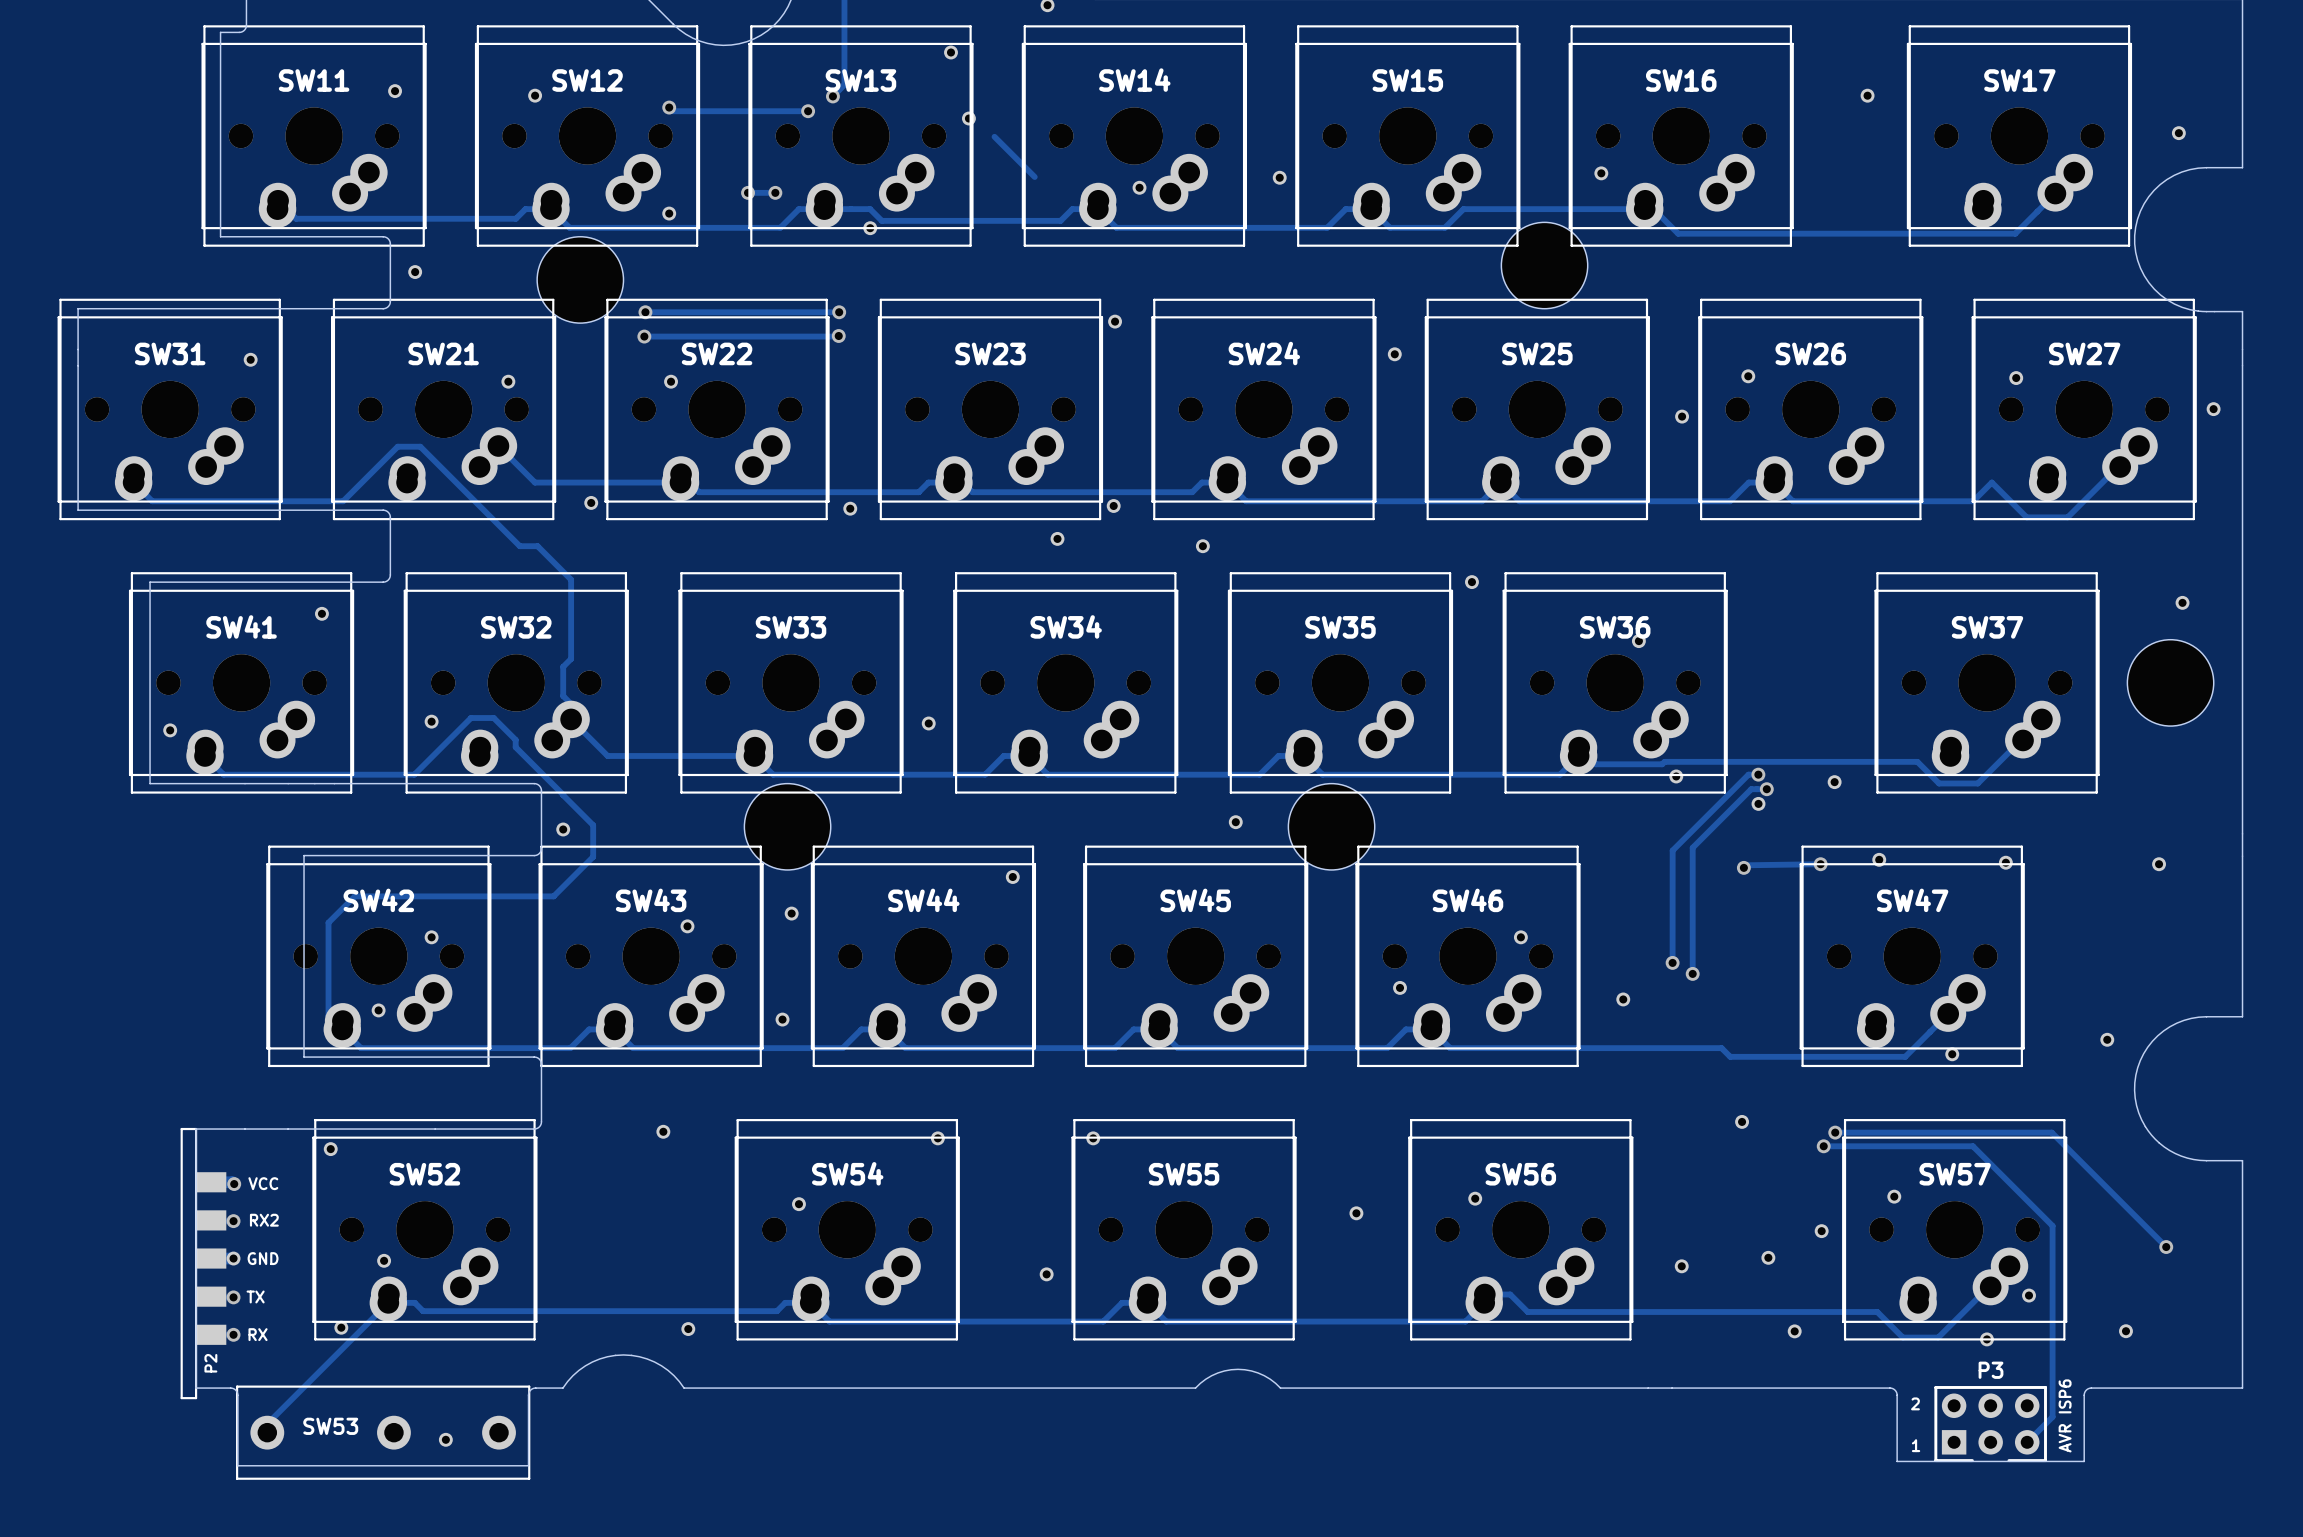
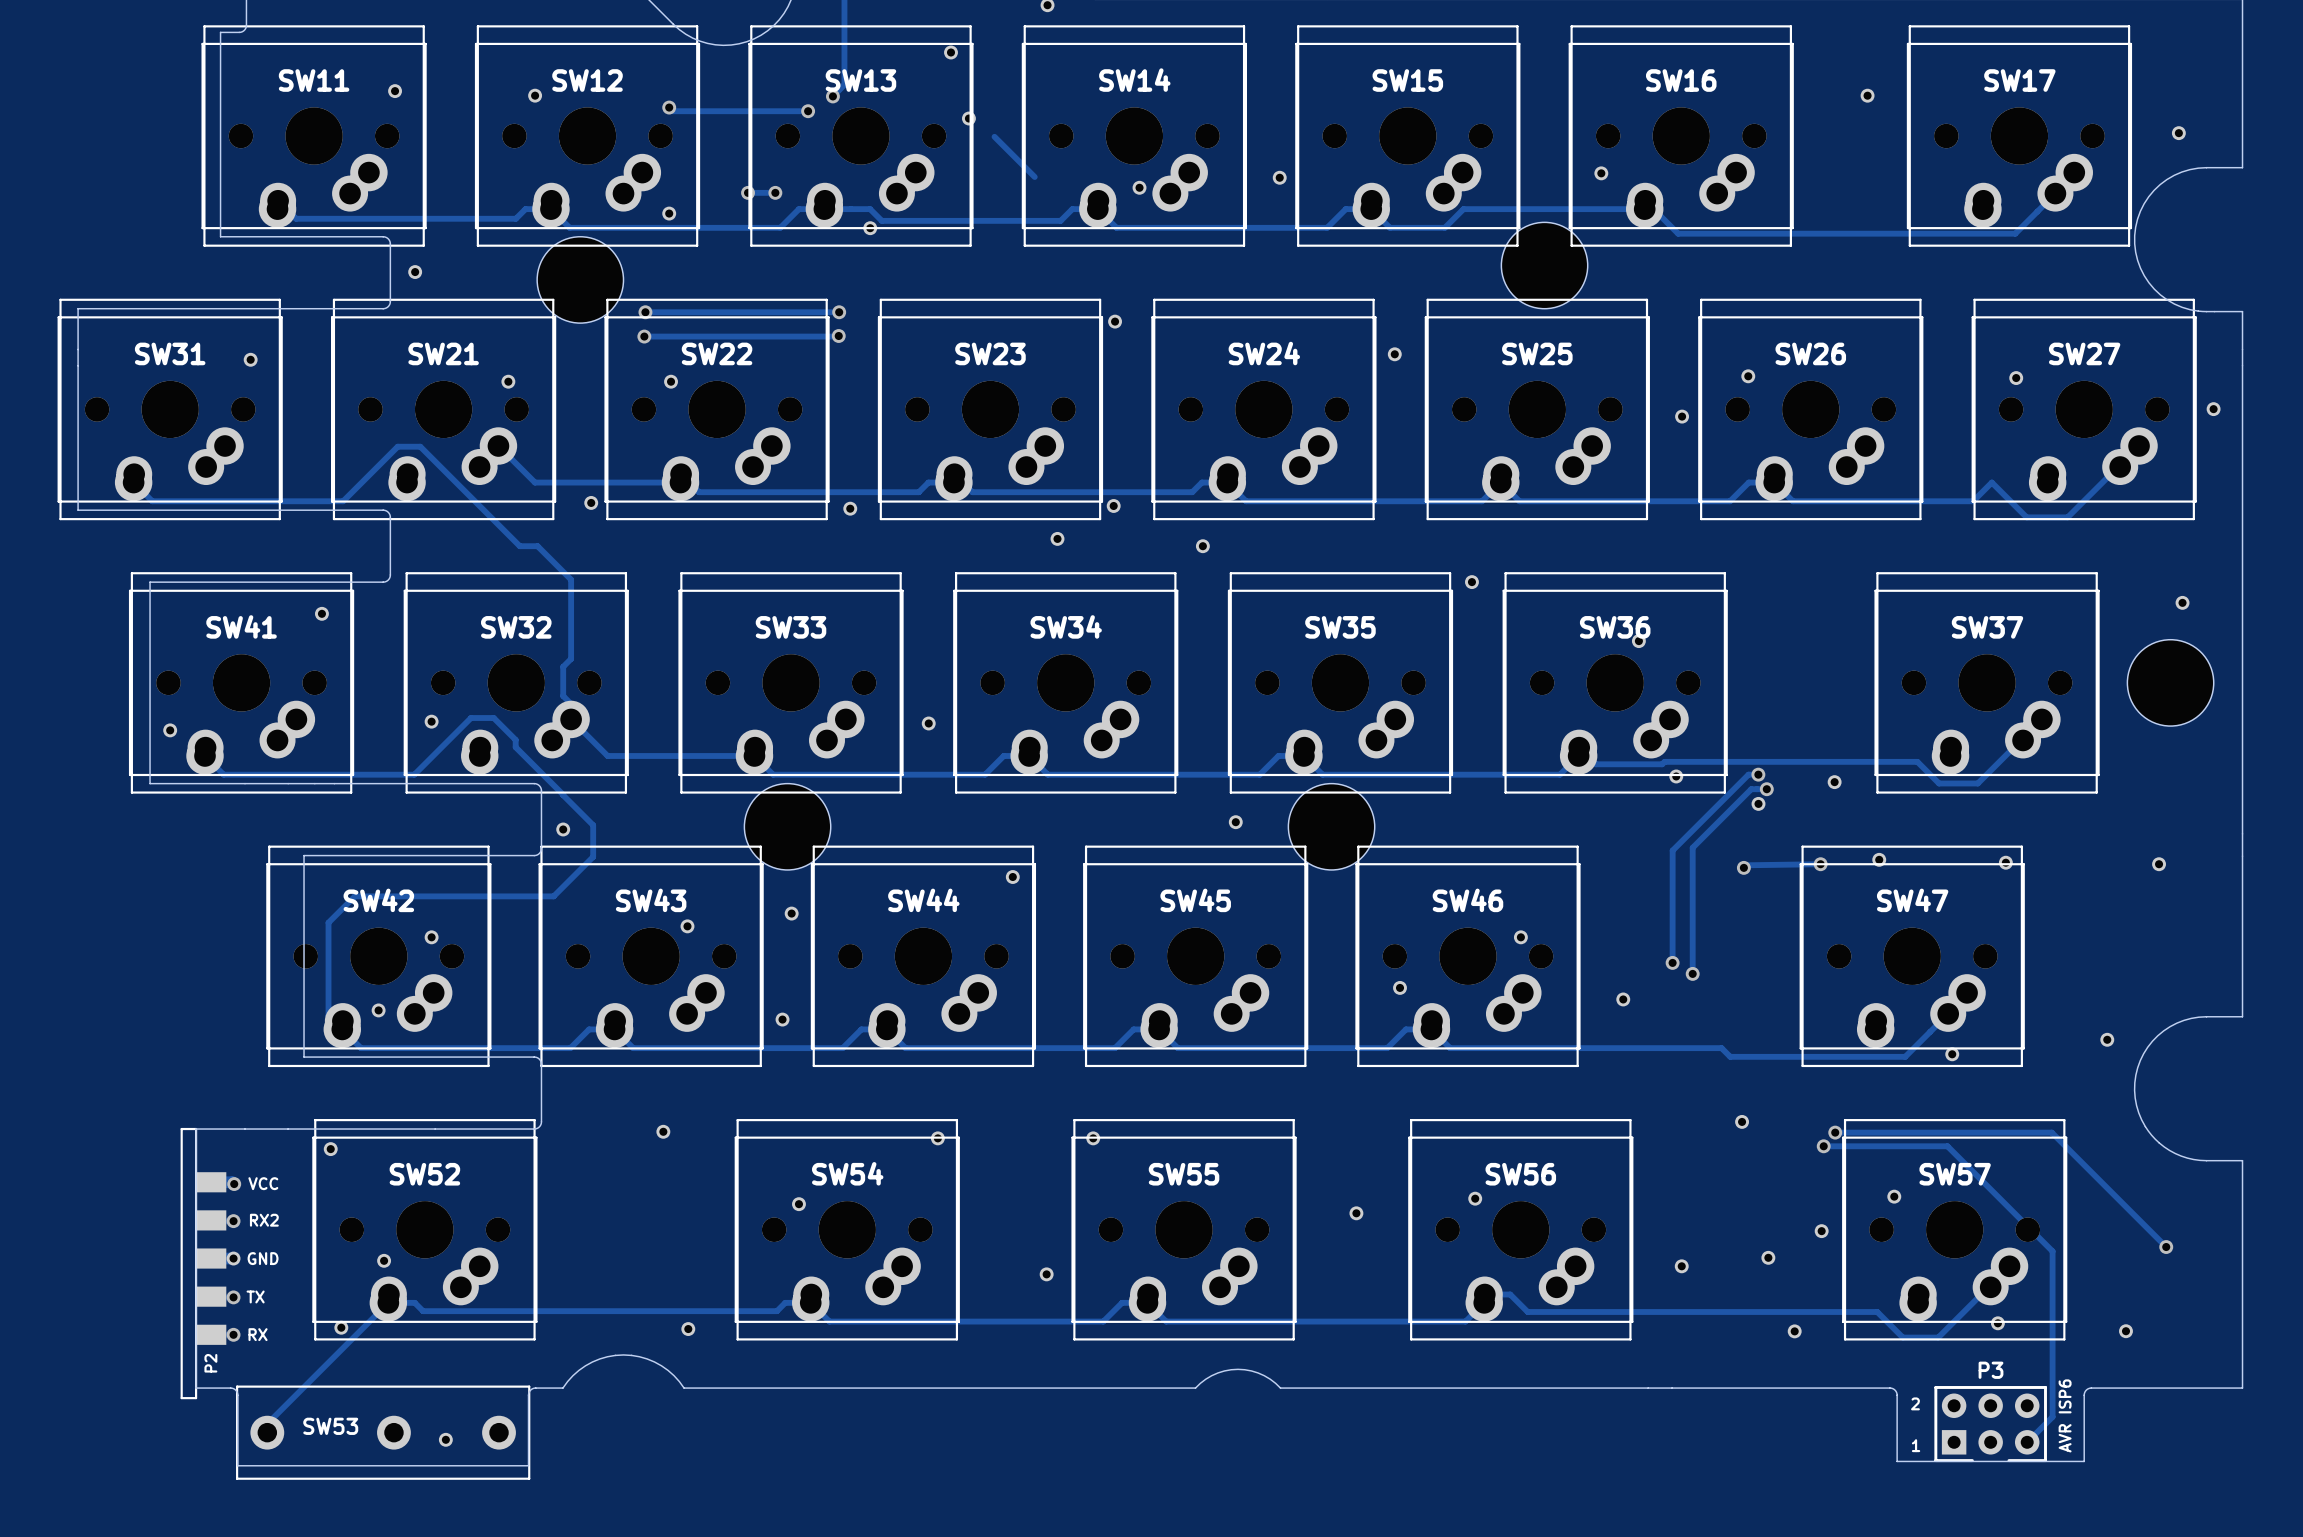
track: (1947, 1146) (1972, 1146) (2052, 1225) (2052, 1251) -> (1947, 1146) (2052, 1251)
part: (2029, 1295) -> none
part position: (1986, 1339) -> (1997, 1323)

